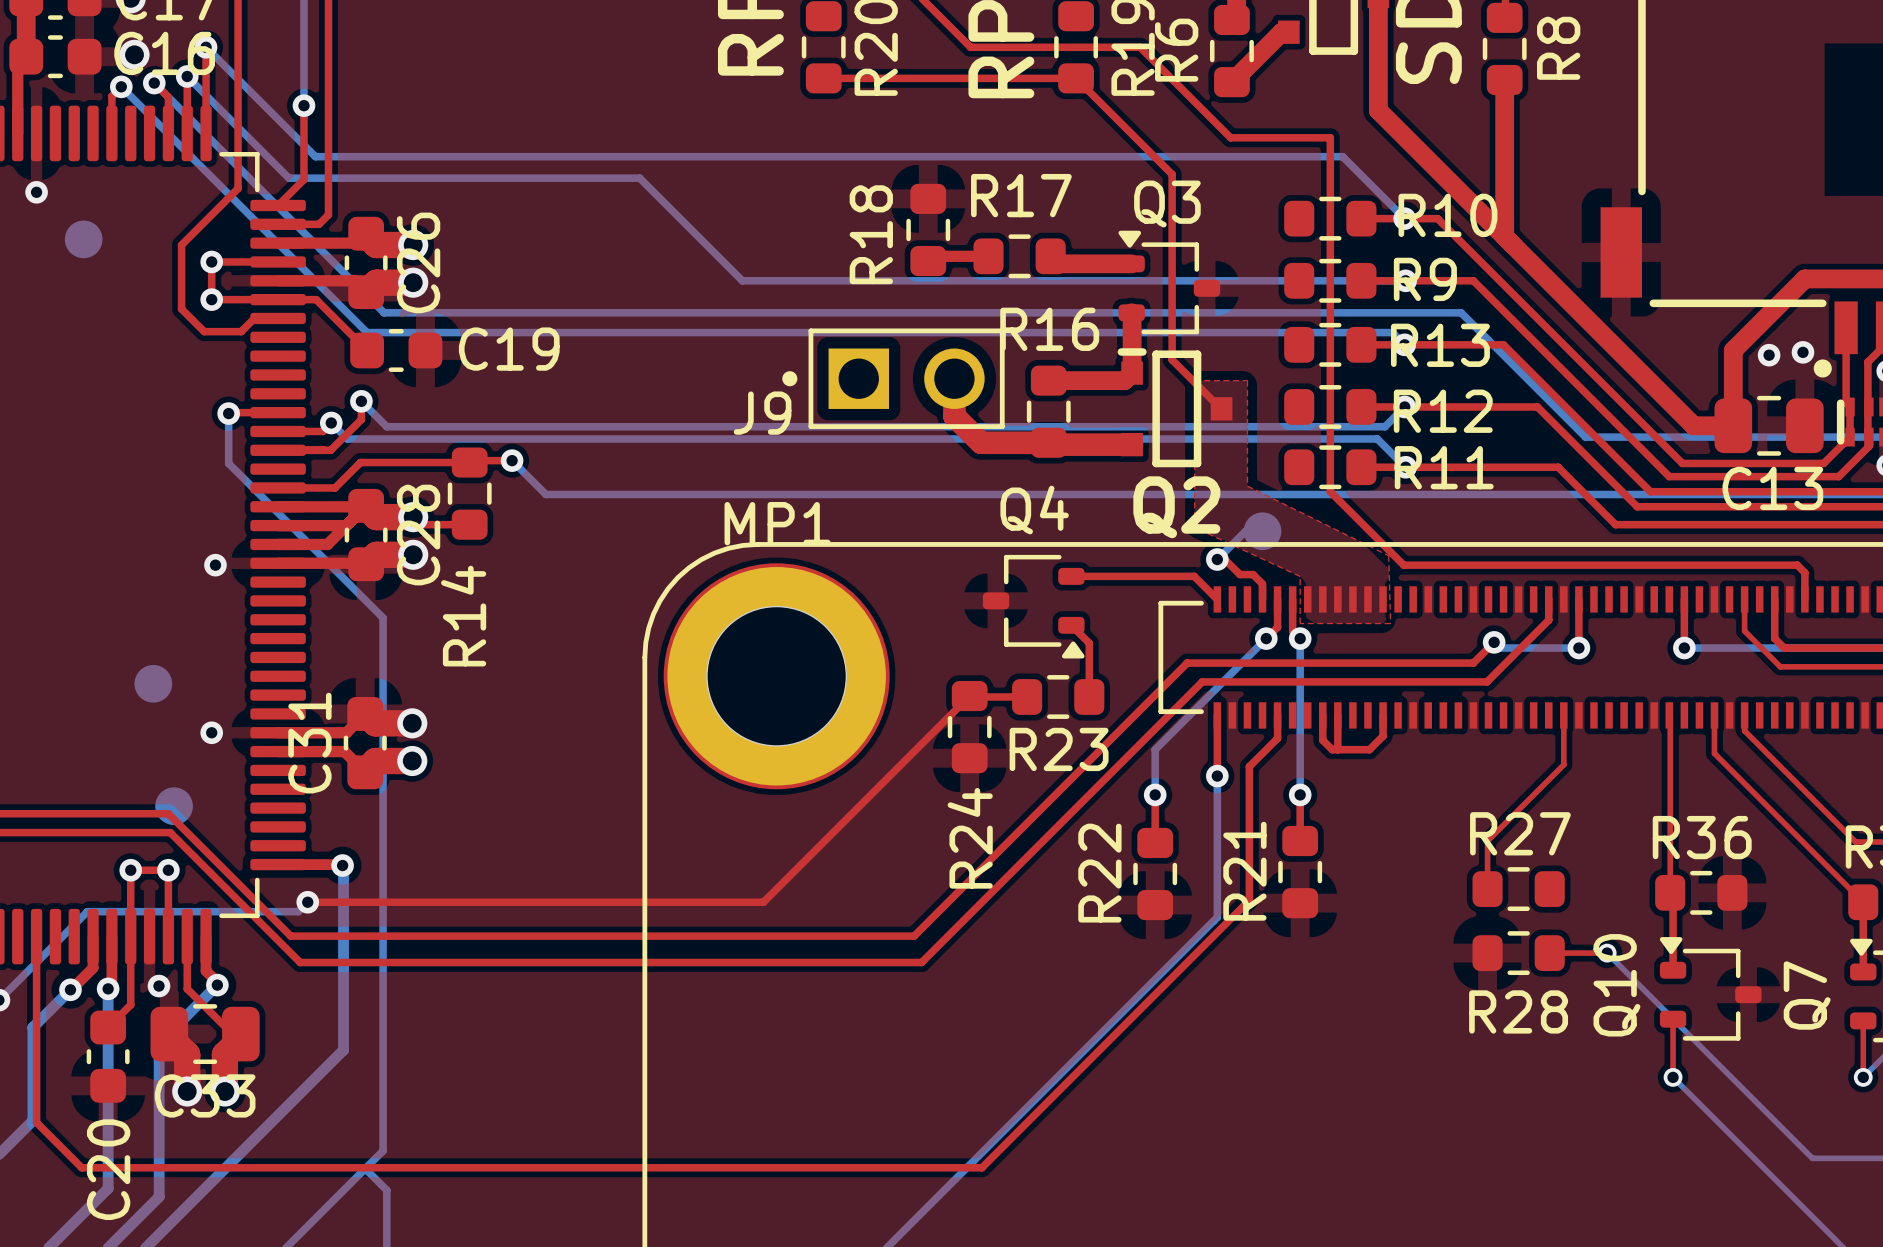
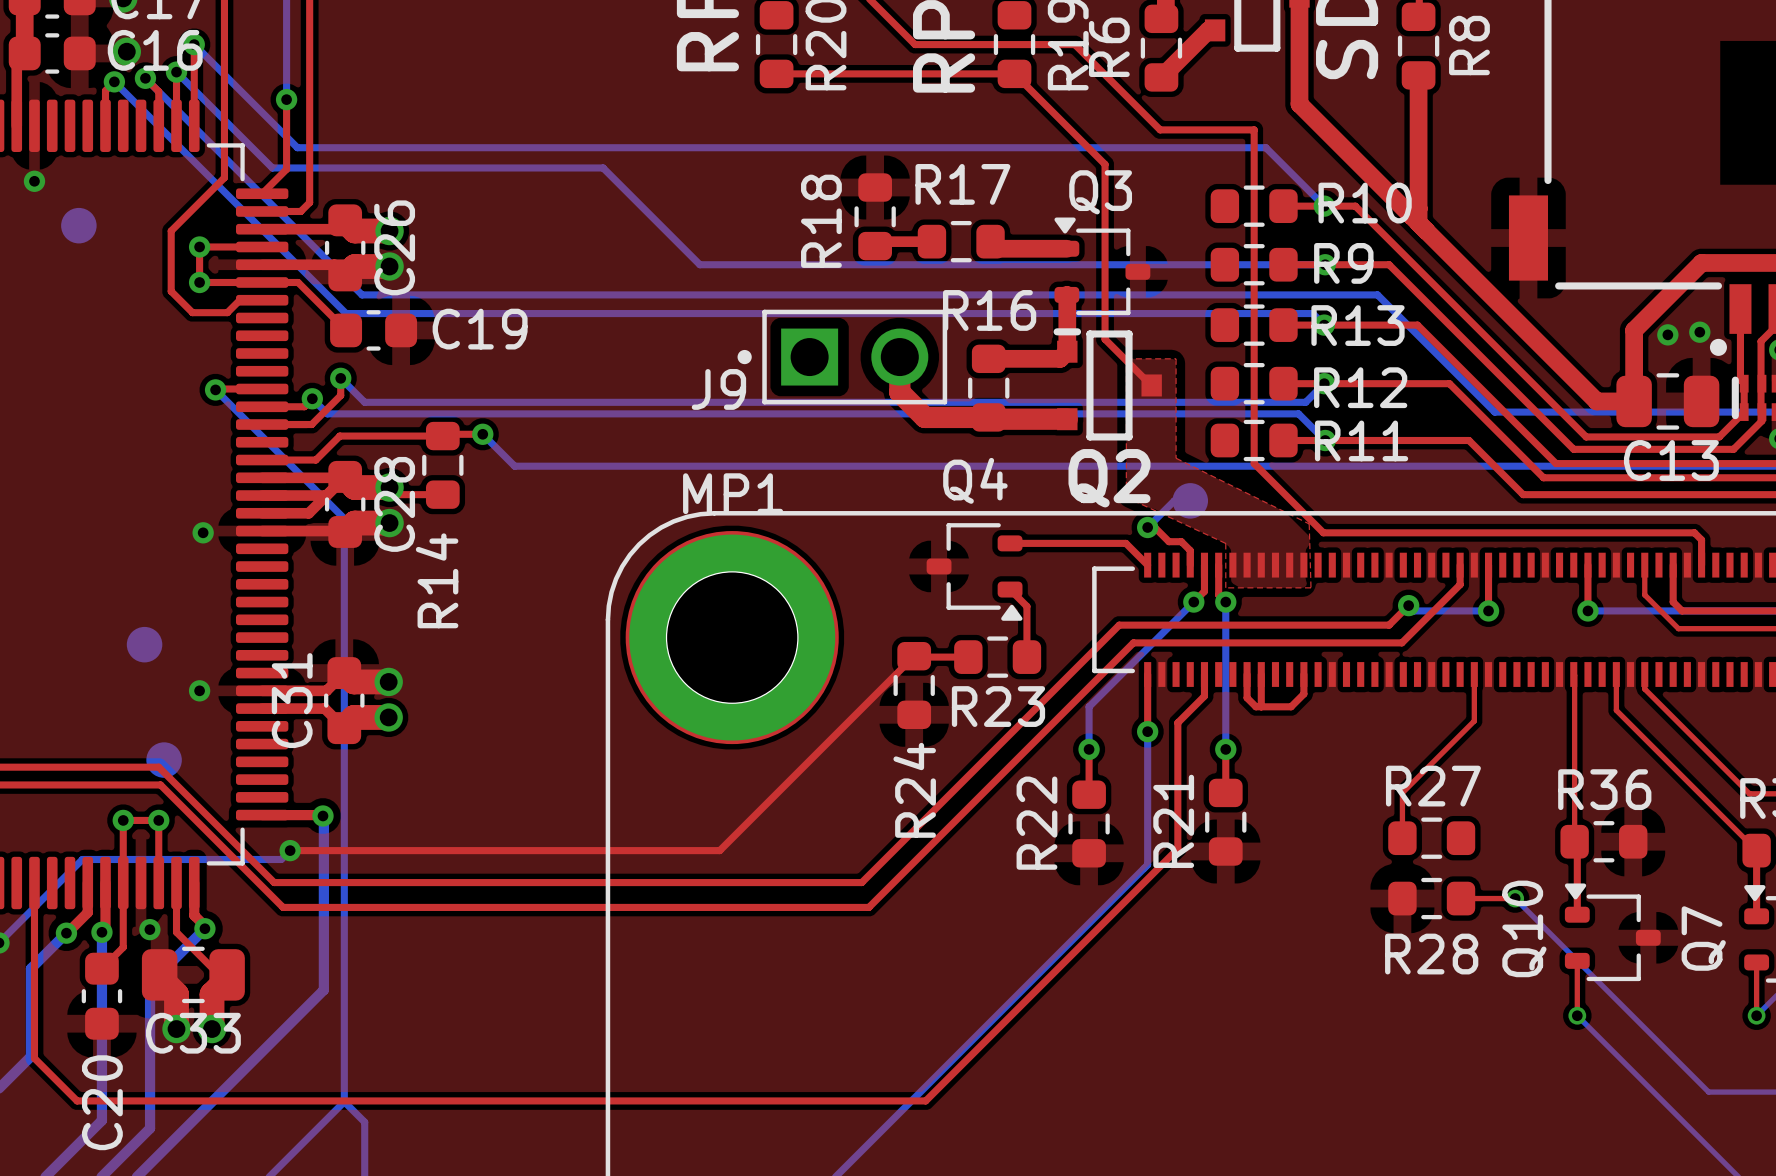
bottom track: (228, 413) (228, 463) (383, 617) (383, 1150) (365, 1168) -> (215, 389) (344, 518) (344, 1101)

